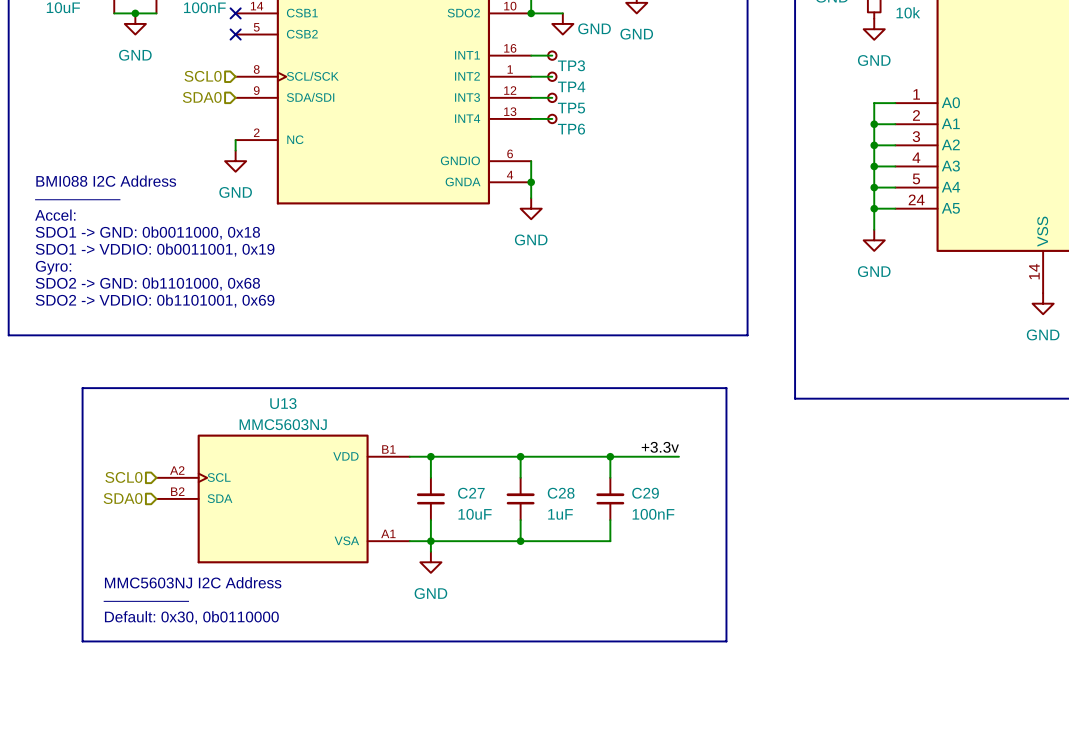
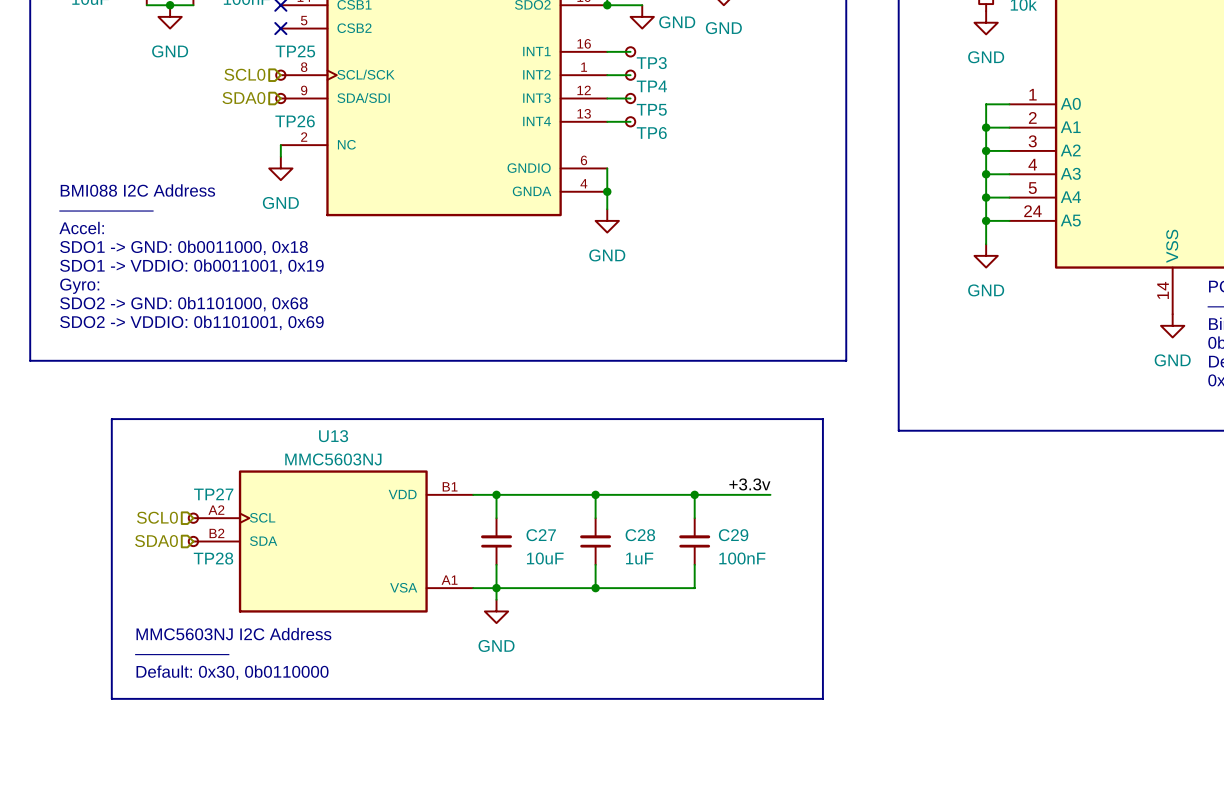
TP25: none -> (280, 75)
TP26: none -> (280, 98)
TP27: none -> (193, 518)
TP28: none -> (193, 541)

